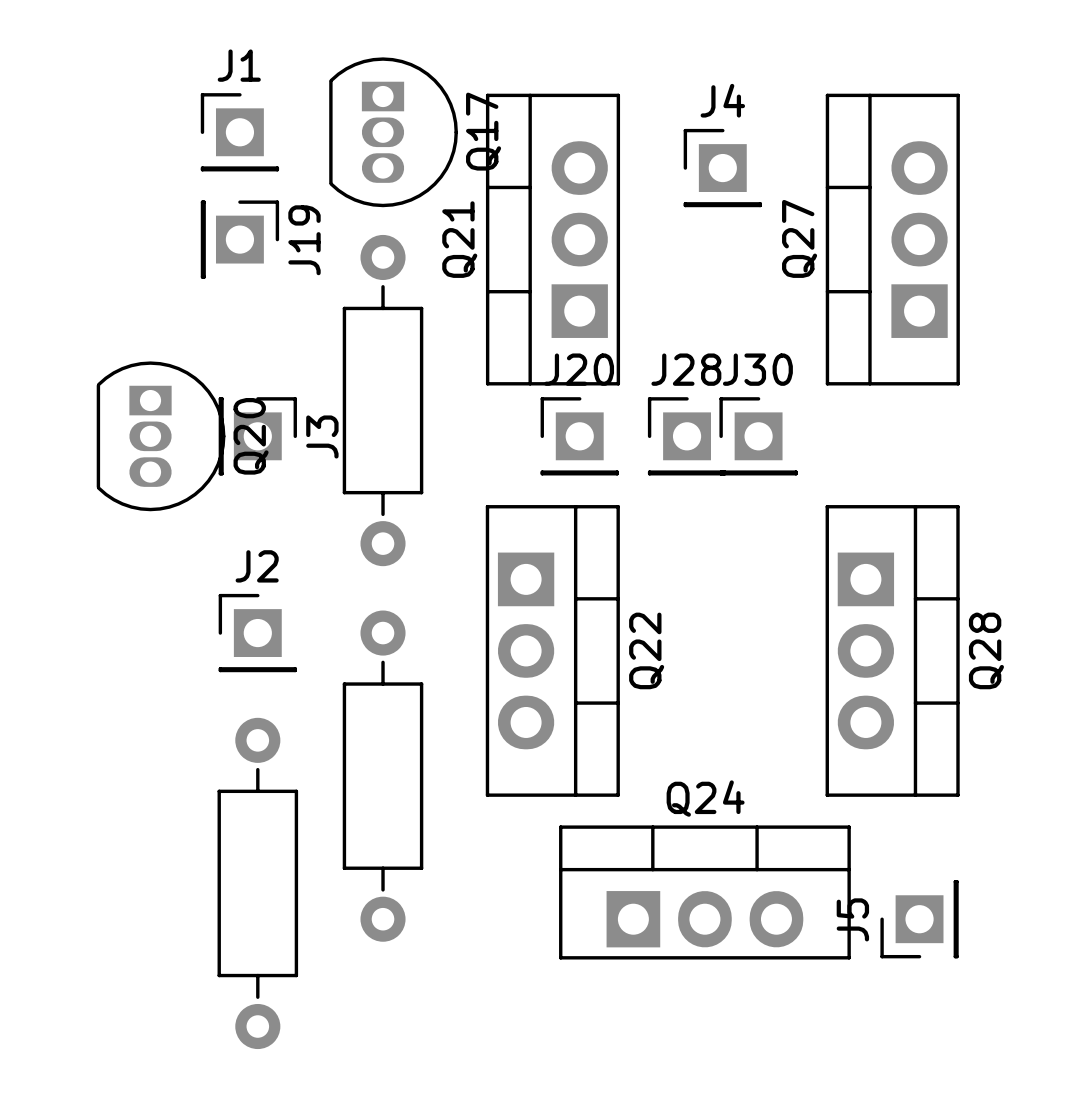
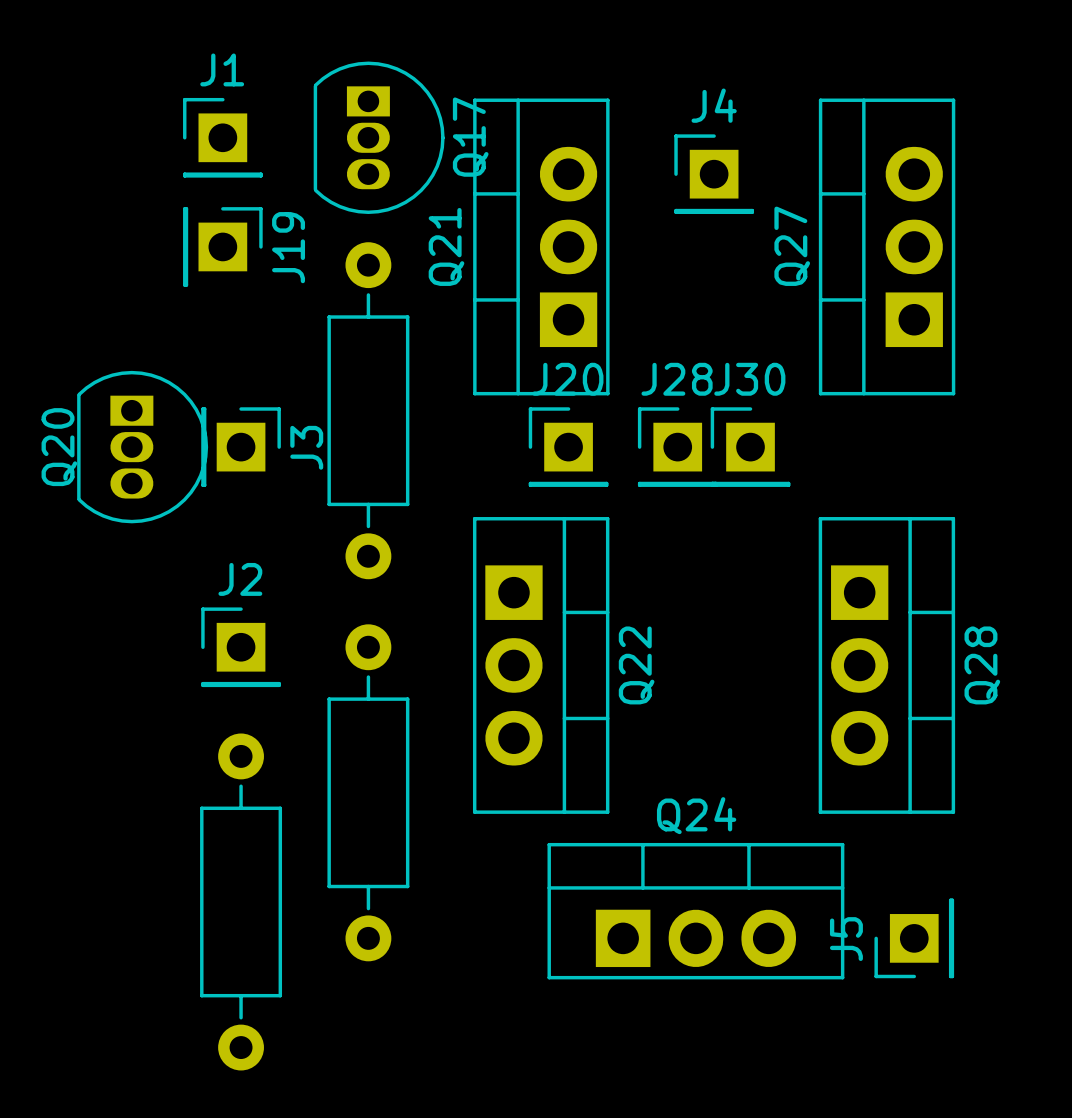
Q20 name position: Q20 (251, 436) -> Q20 (59, 447)

